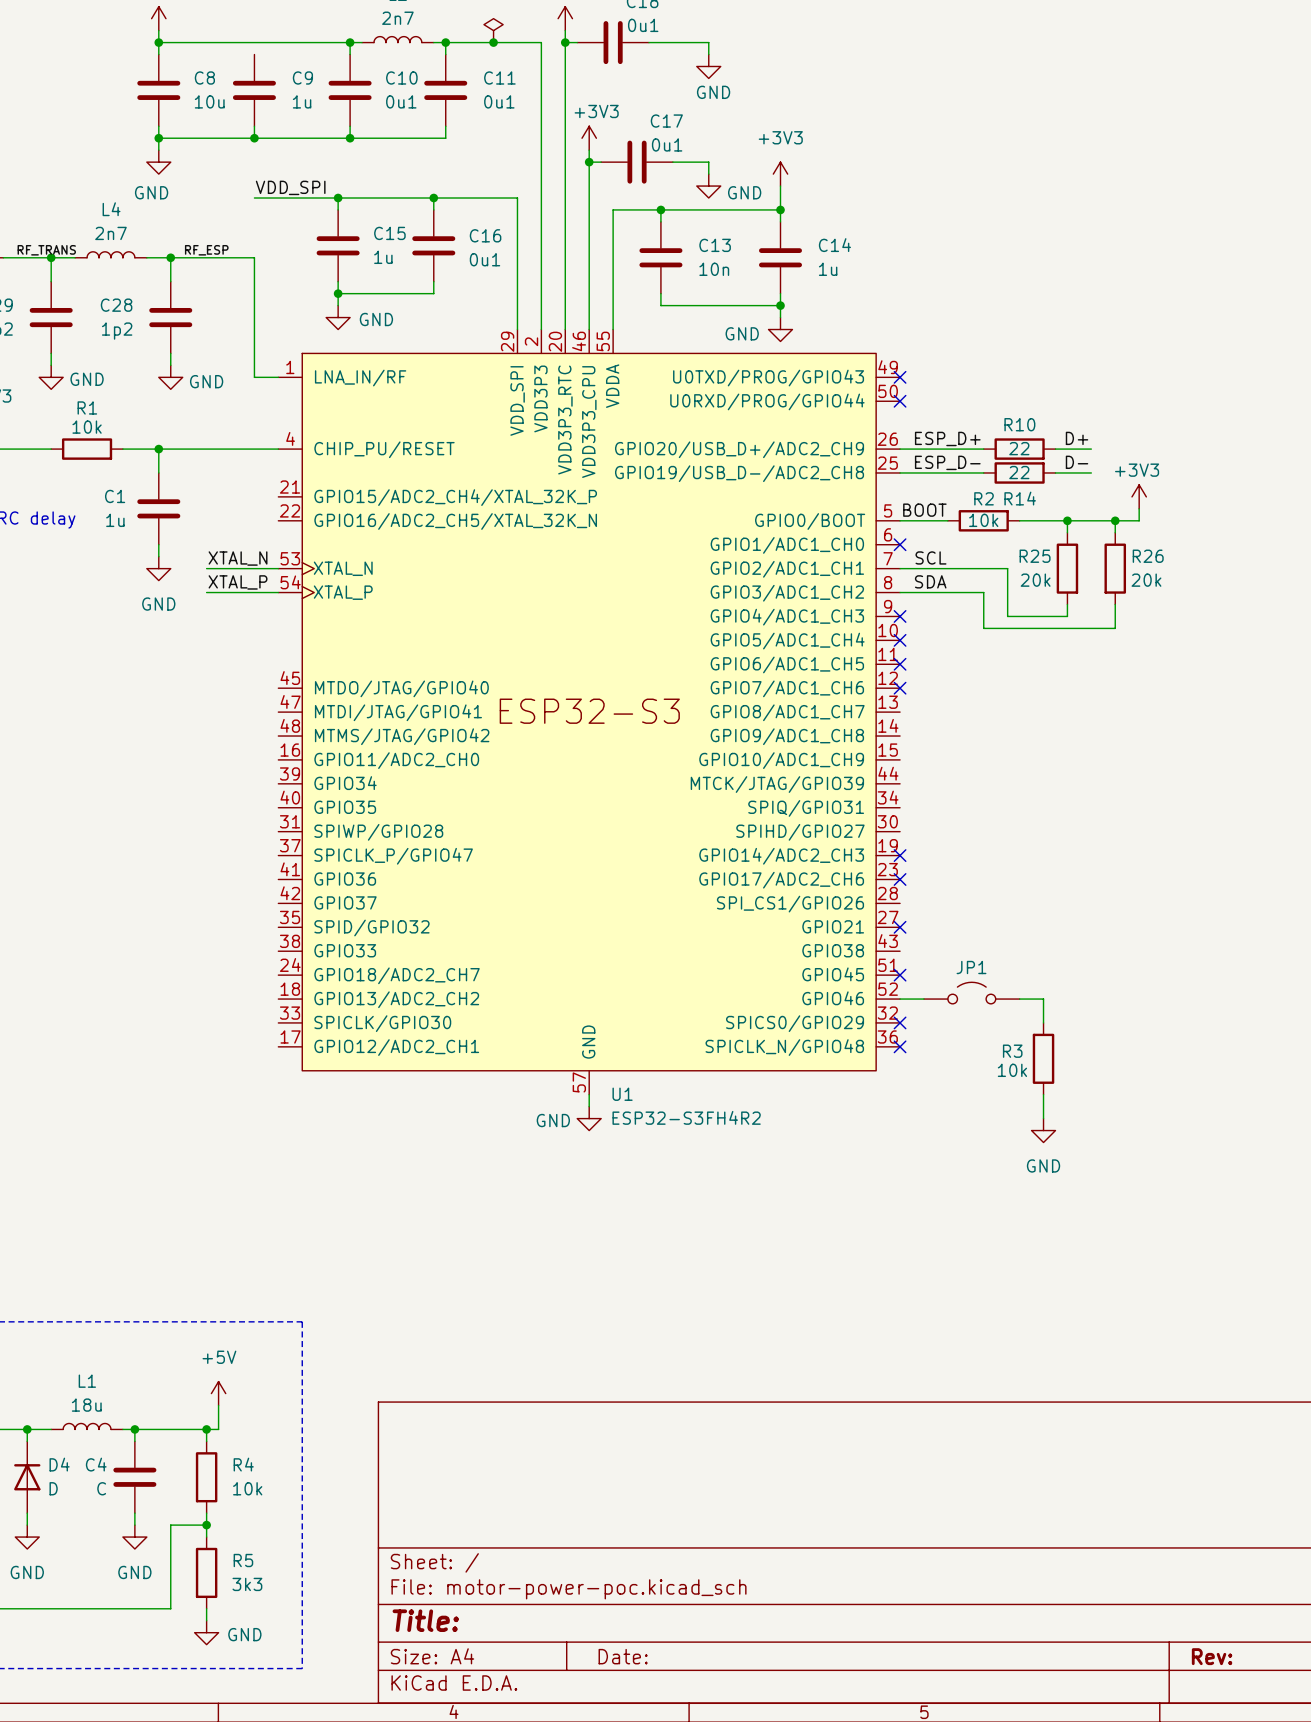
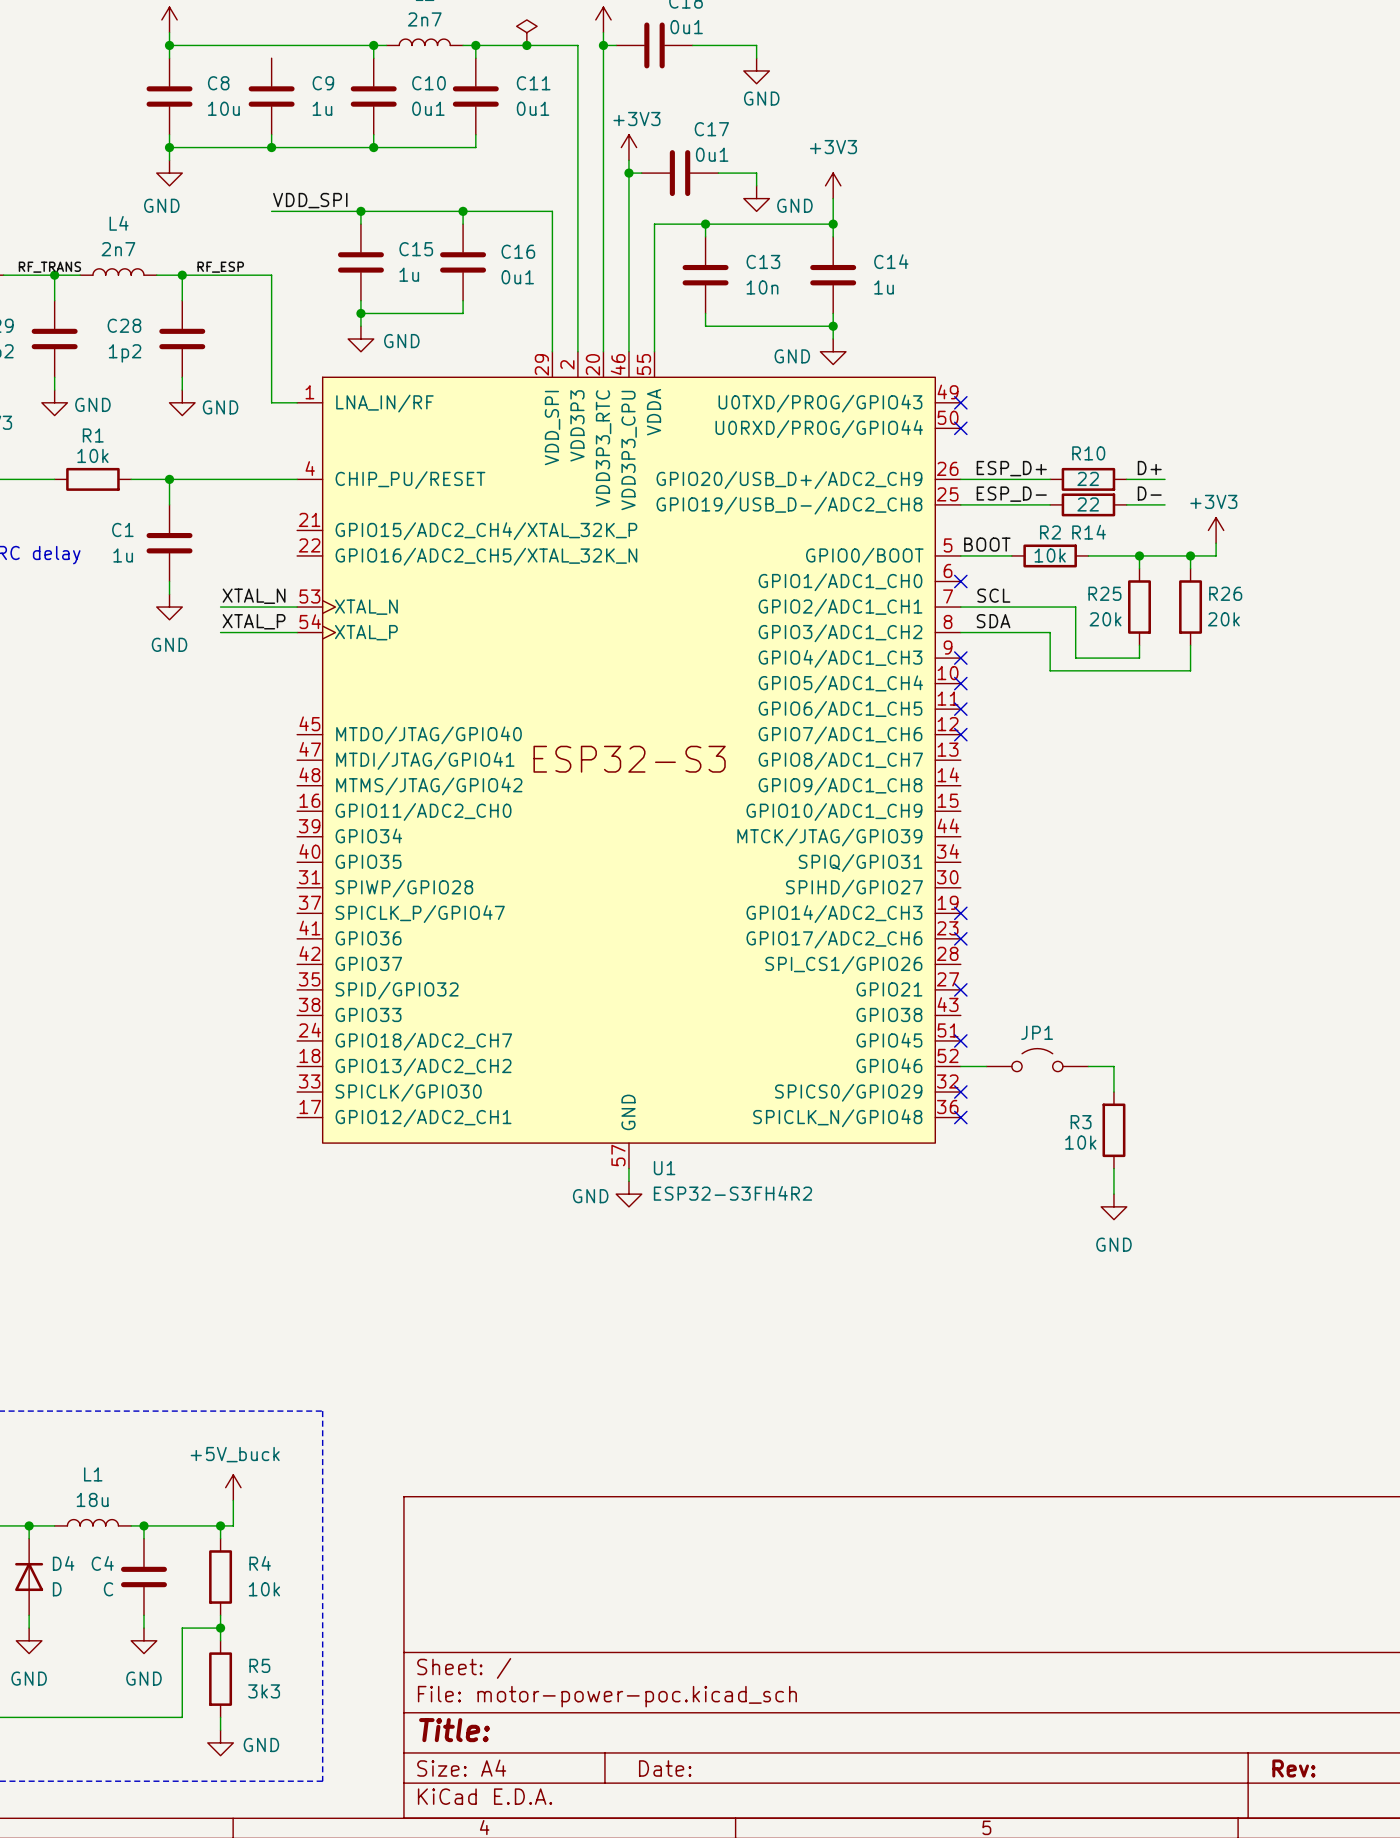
power symbol: +5V (218, 1393) -> +5V_buck (233, 1487)

